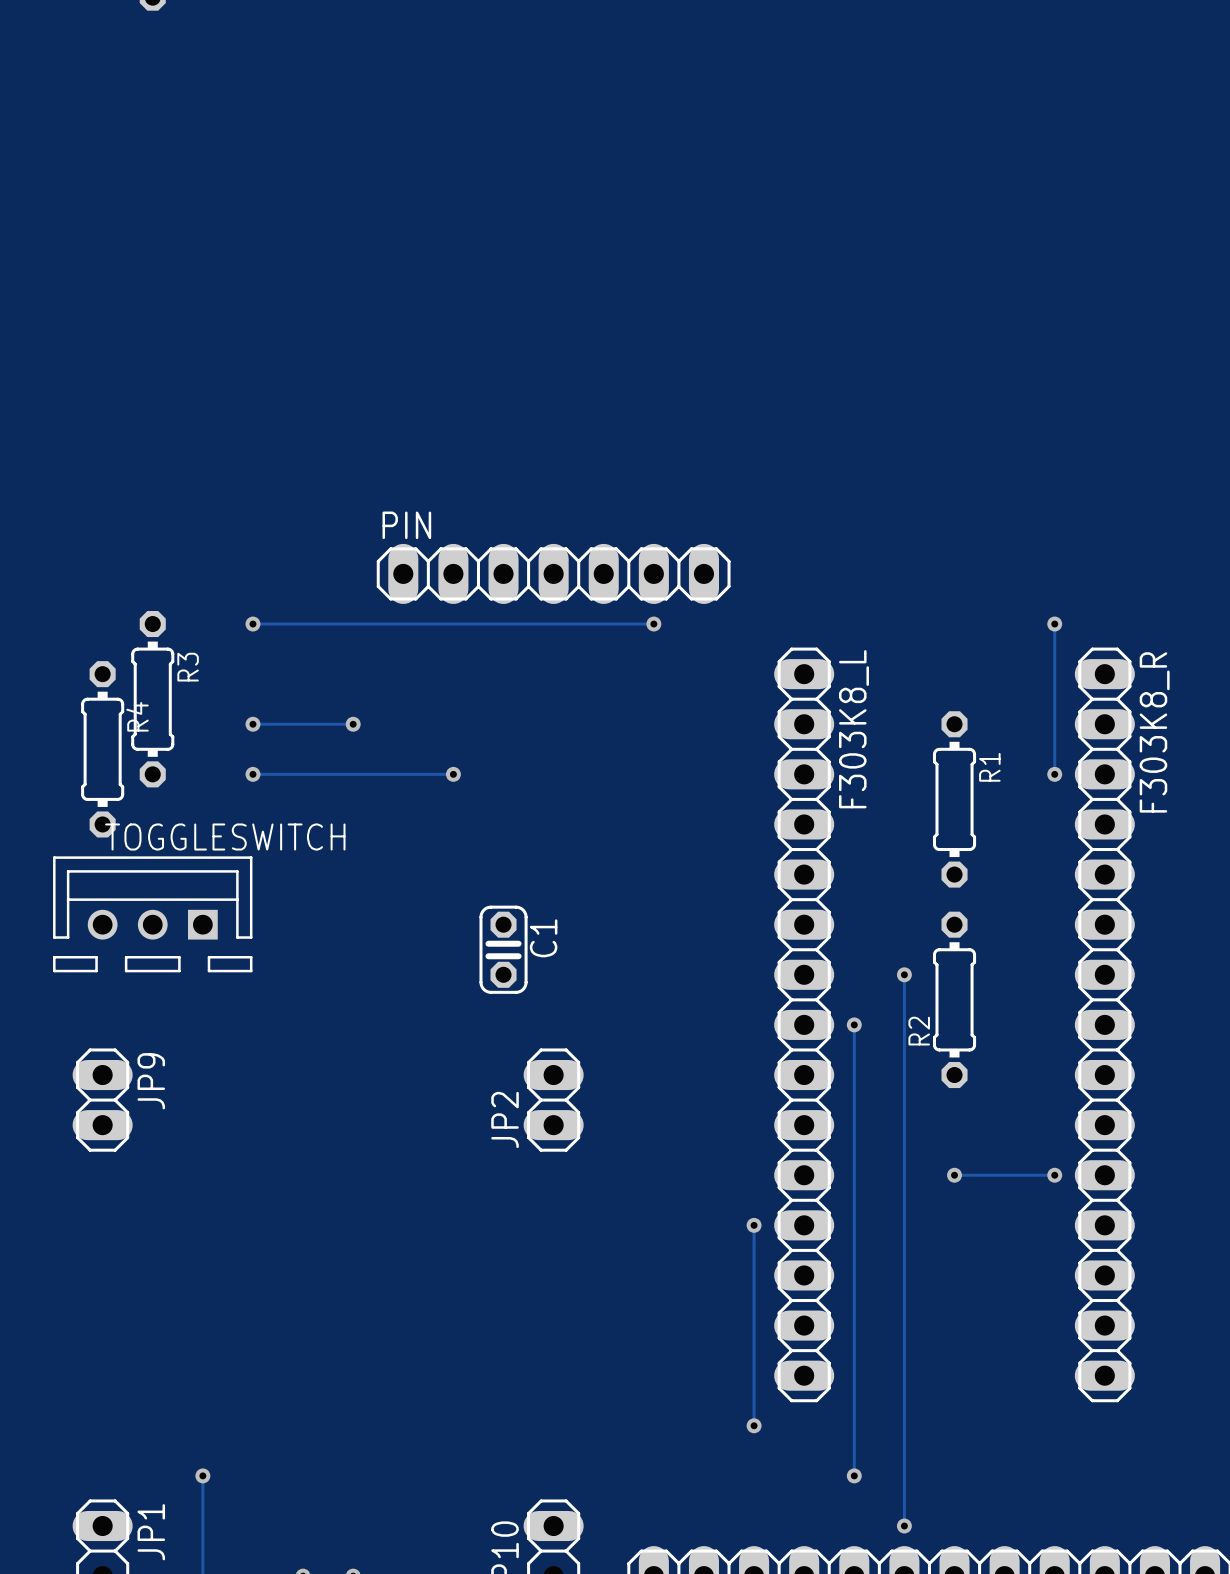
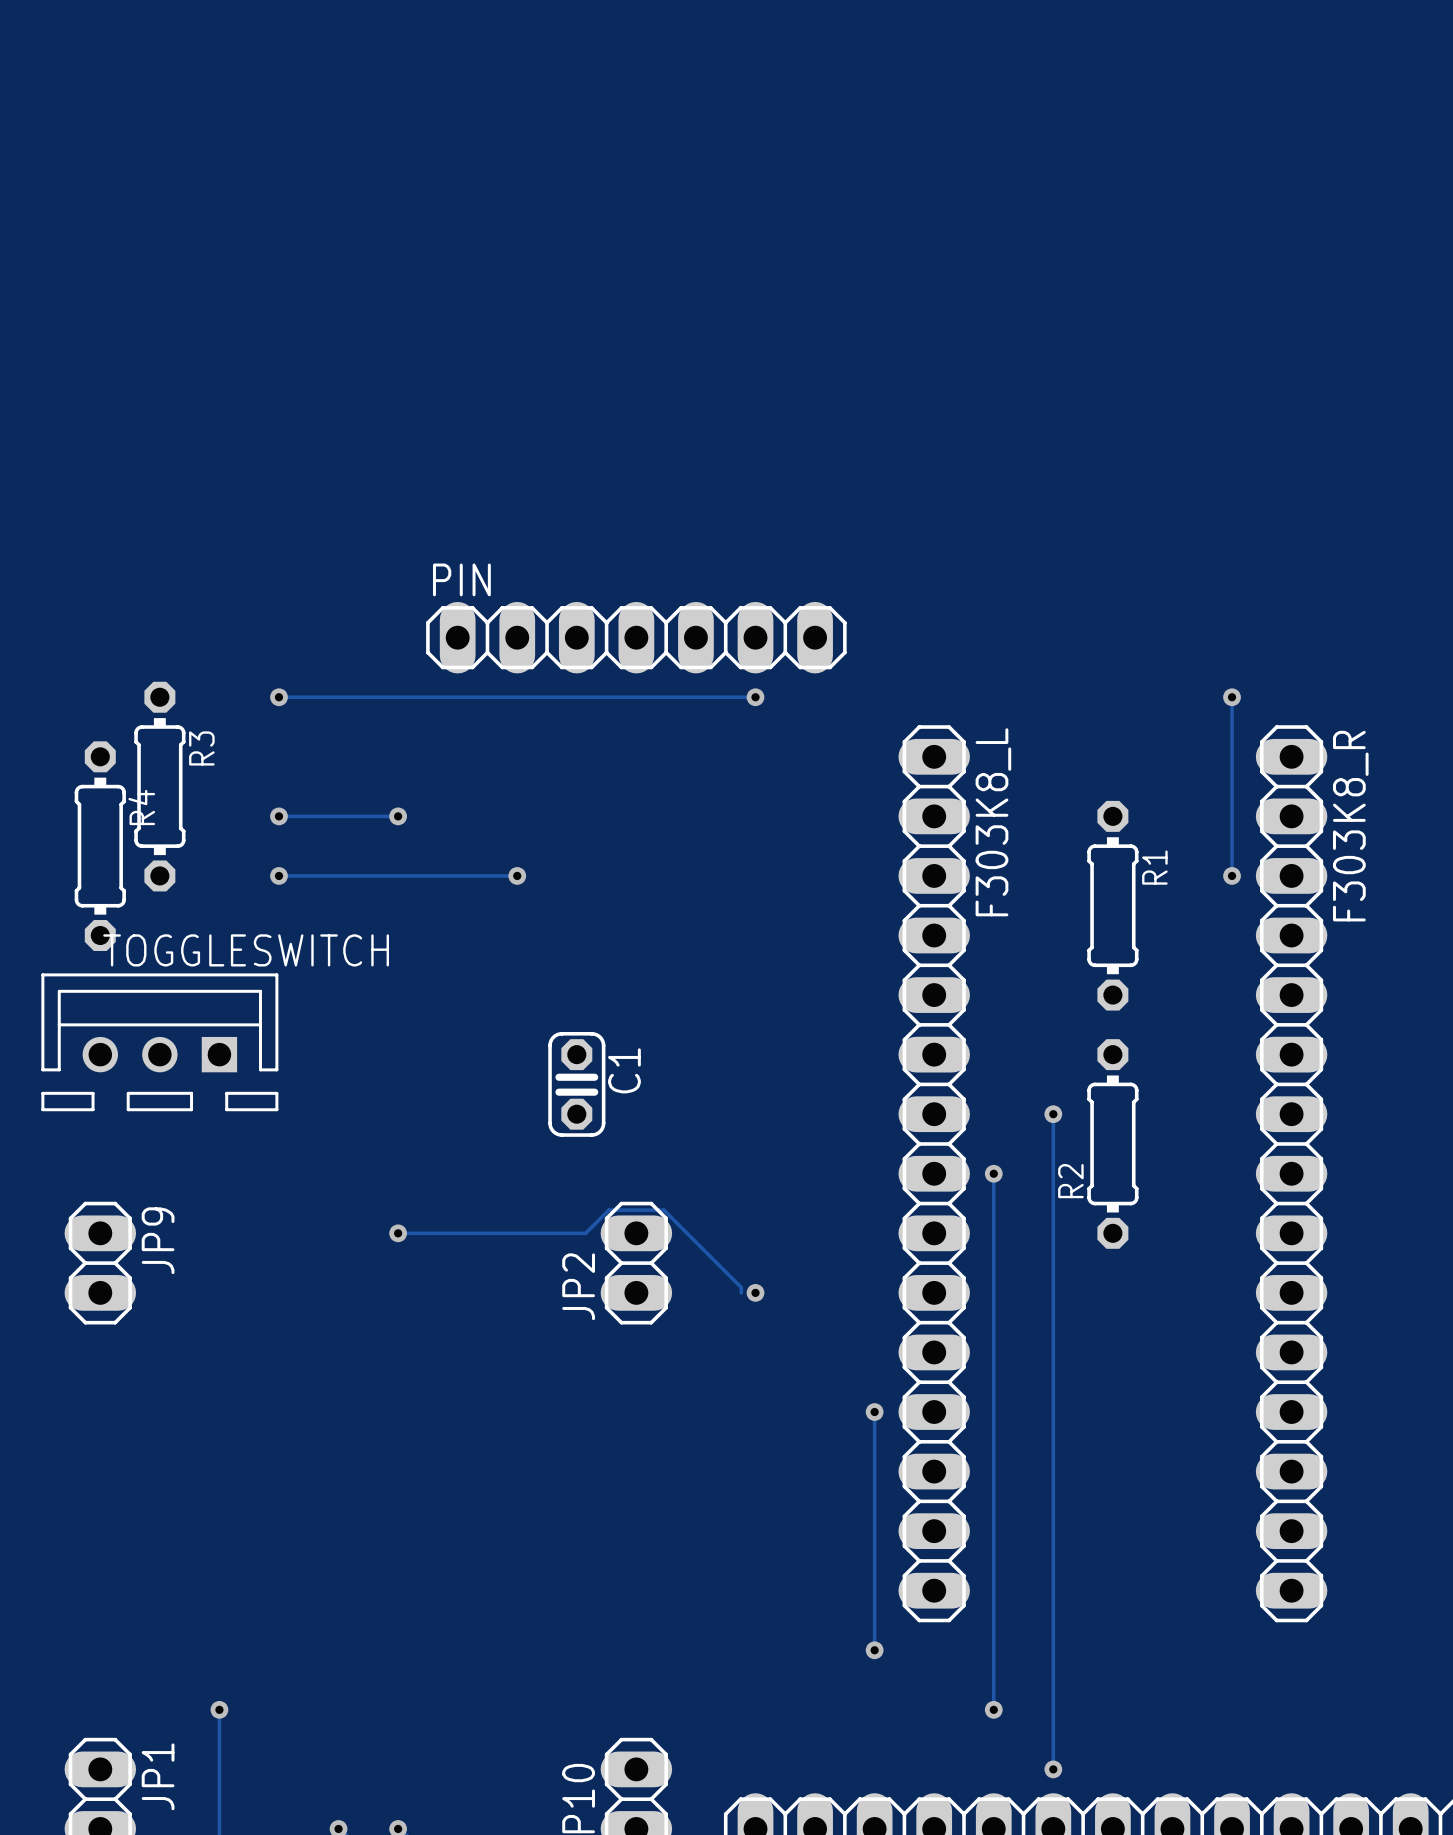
track: none -> (398, 1233) (585, 1233) (608, 1210) (663, 1210) (741, 1287) (741, 1292)
via: none -> (398, 1233)
via: none -> (755, 1292)
track: (954, 1175) (1054, 1175) -> none
via: (954, 1175) -> none
via: (1054, 1175) -> none

